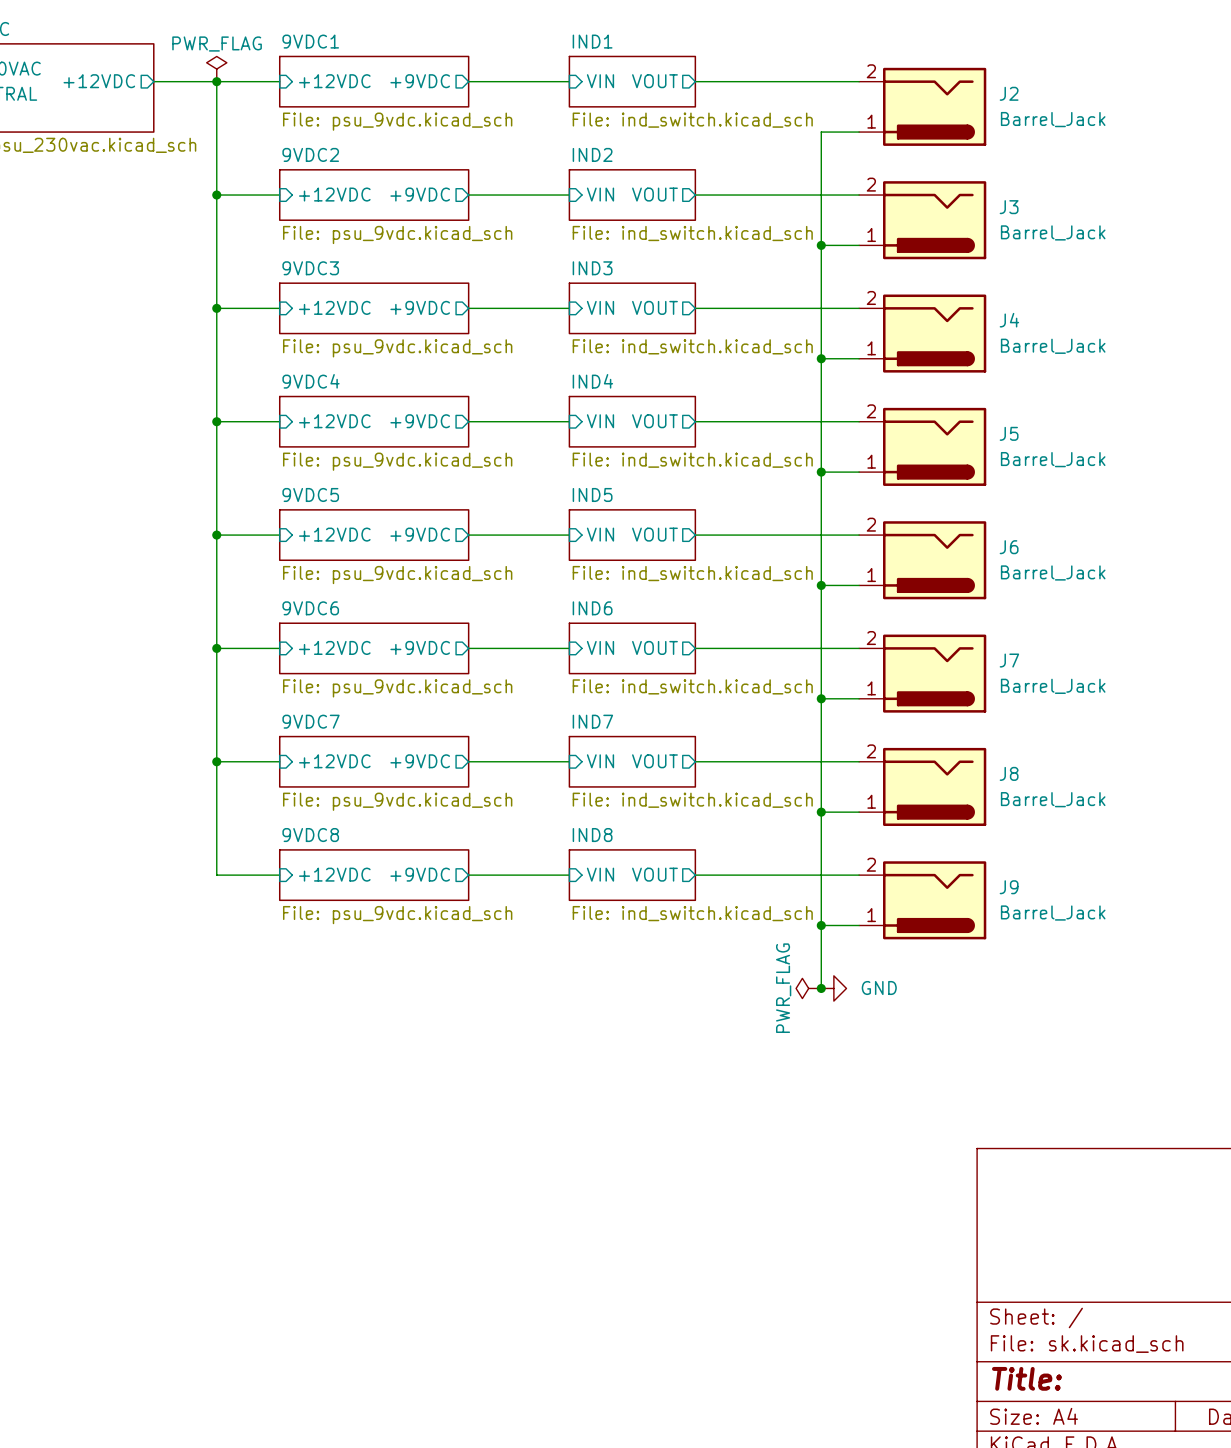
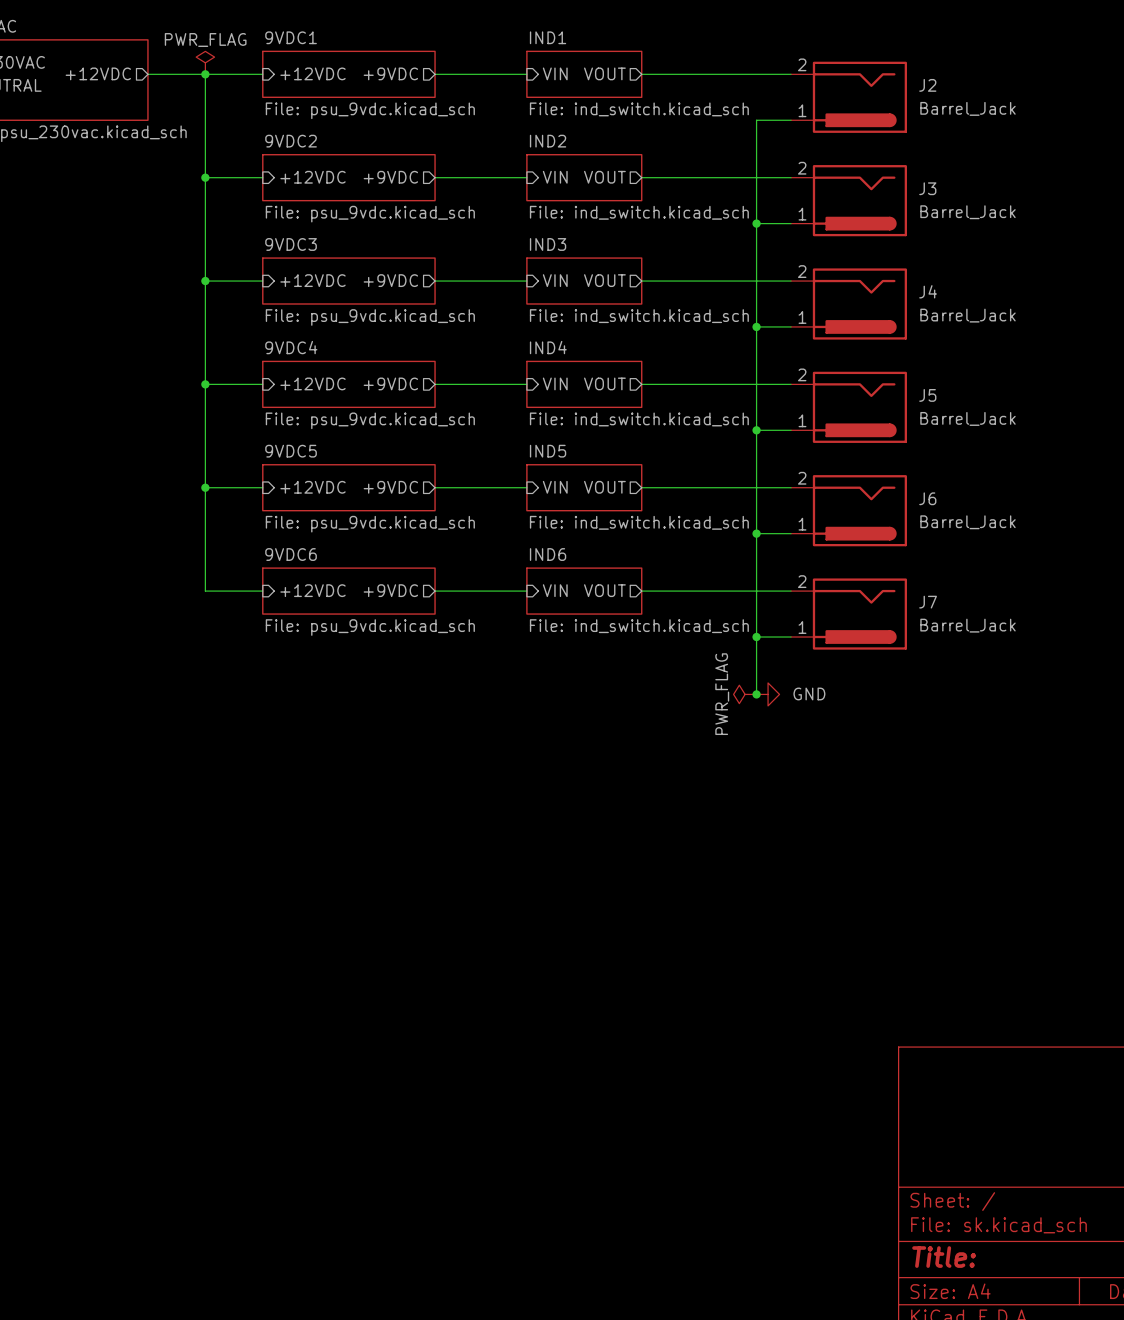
wire: (216, 648) (216, 875) (279, 875) -> none
junction: (216, 648) -> none
wire: (216, 761) (279, 761) -> none
junction: (216, 761) -> none
sheet pin: +12VDC (334, 761) -> none
sheet 9VDC7: File: psu_9vdc.kicad_sch (374, 761) -> none
sheet pin: +9VDC (420, 761) -> none
wire: (468, 761) (569, 761) -> none
sheet pin: VIN (600, 761) -> none
sheet IND7: File: ind_switch.kicad_sch (632, 761) -> none
sheet pin: VOUT (654, 761) -> none
wire: (695, 761) (859, 761) -> none
wire: (821, 761) (821, 988) -> none
J8: Barrel_Jack (922, 786) -> none
wire: (821, 812) (859, 812) -> none
junction position: (821, 812) -> (756, 694)
sheet pin: +12VDC (334, 874) -> none
sheet pin: +9VDC (420, 874) -> none
sheet pin: VIN (600, 874) -> none
sheet pin: VOUT (654, 874) -> none
sheet 9VDC8: File: psu_9vdc.kicad_sch (374, 875) -> none
wire: (468, 875) (569, 875) -> none
sheet IND8: File: ind_switch.kicad_sch (632, 875) -> none
wire: (695, 875) (859, 875) -> none
J9: Barrel_Jack (922, 900) -> none
wire: (821, 925) (859, 925) -> none
junction: (821, 925) -> none
power symbol position: PWR_FLAG (808, 988) -> PWR_FLAG (745, 694)
junction: (821, 988) -> none
power symbol position: GND (833, 988) -> GND (768, 694)

